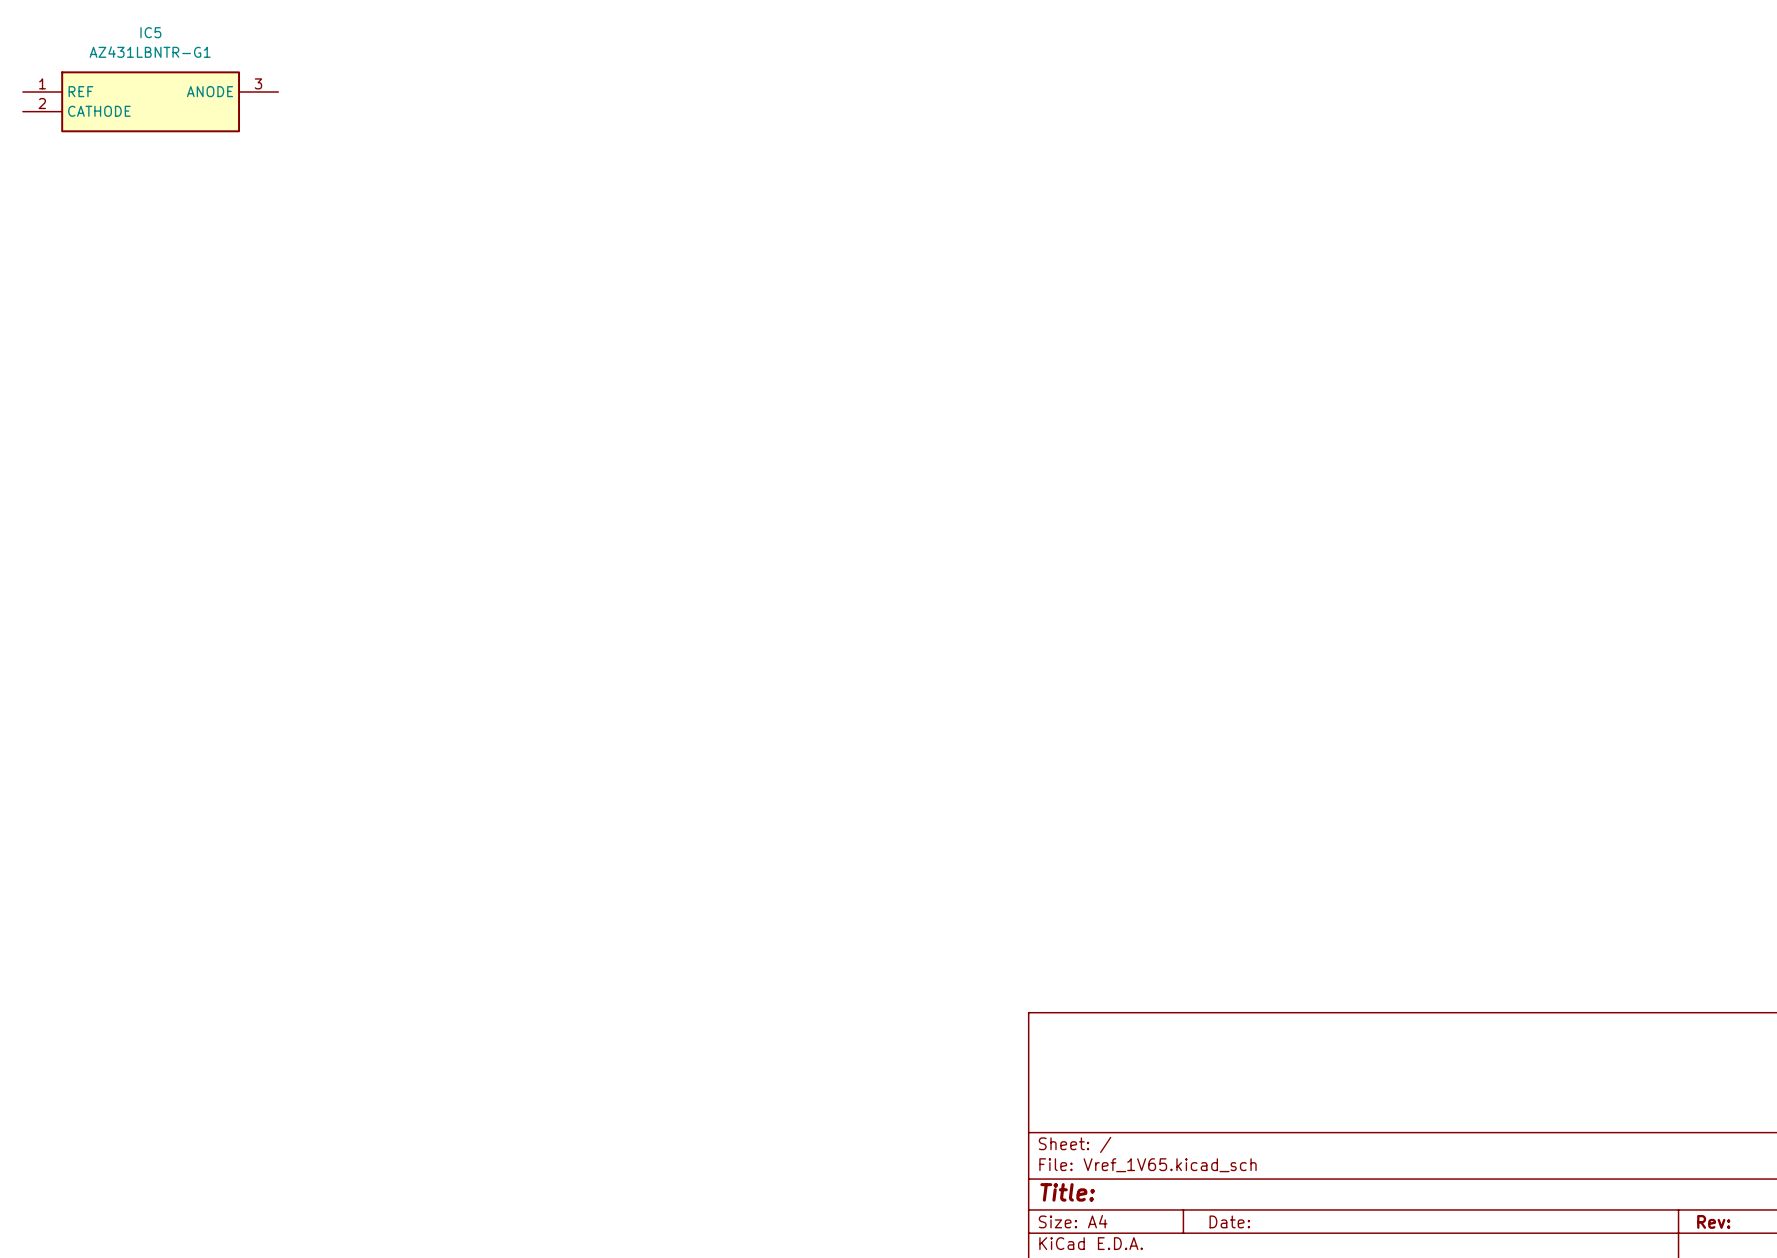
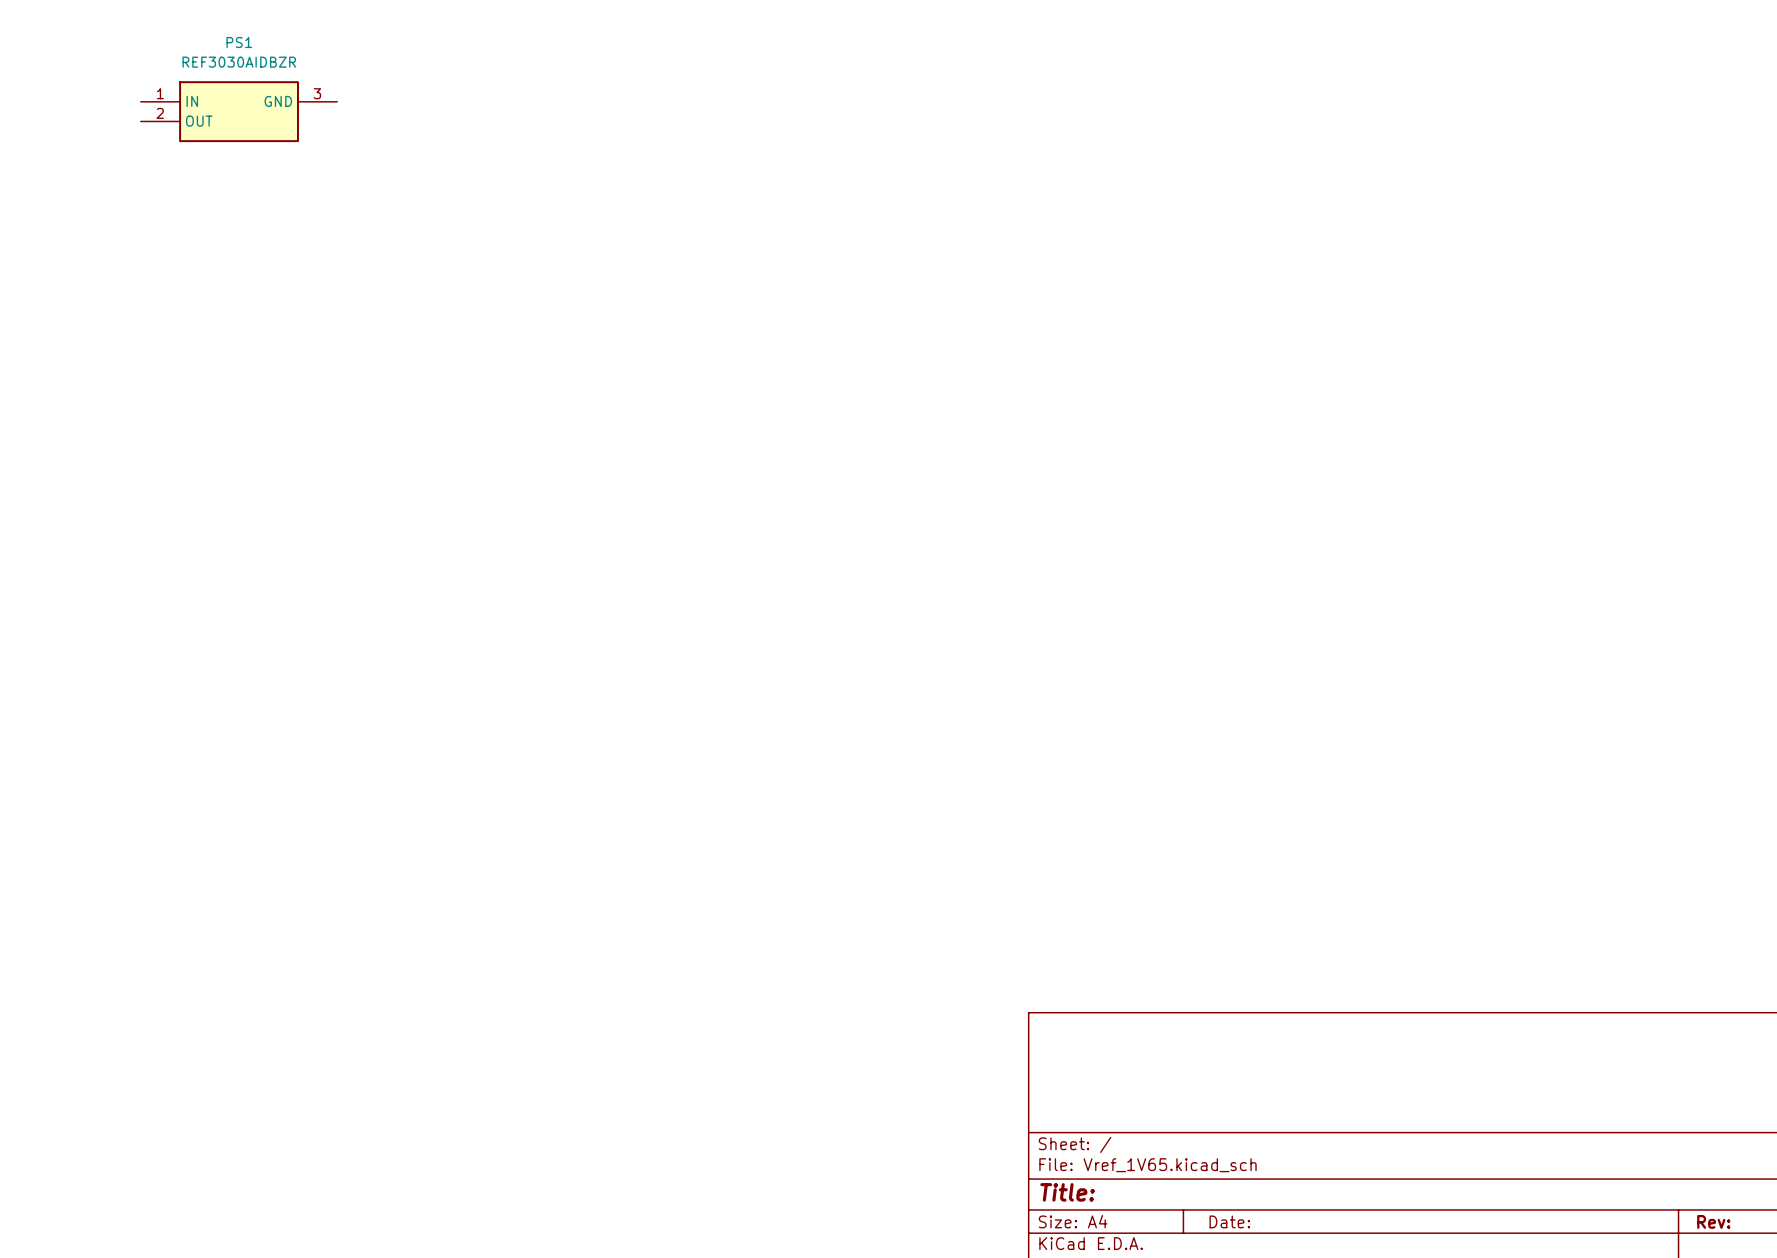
IC5: AZ431LBNTR-G1 (150, 101) -> none
PS1: none -> REF3030AIDBZR (239, 111)

